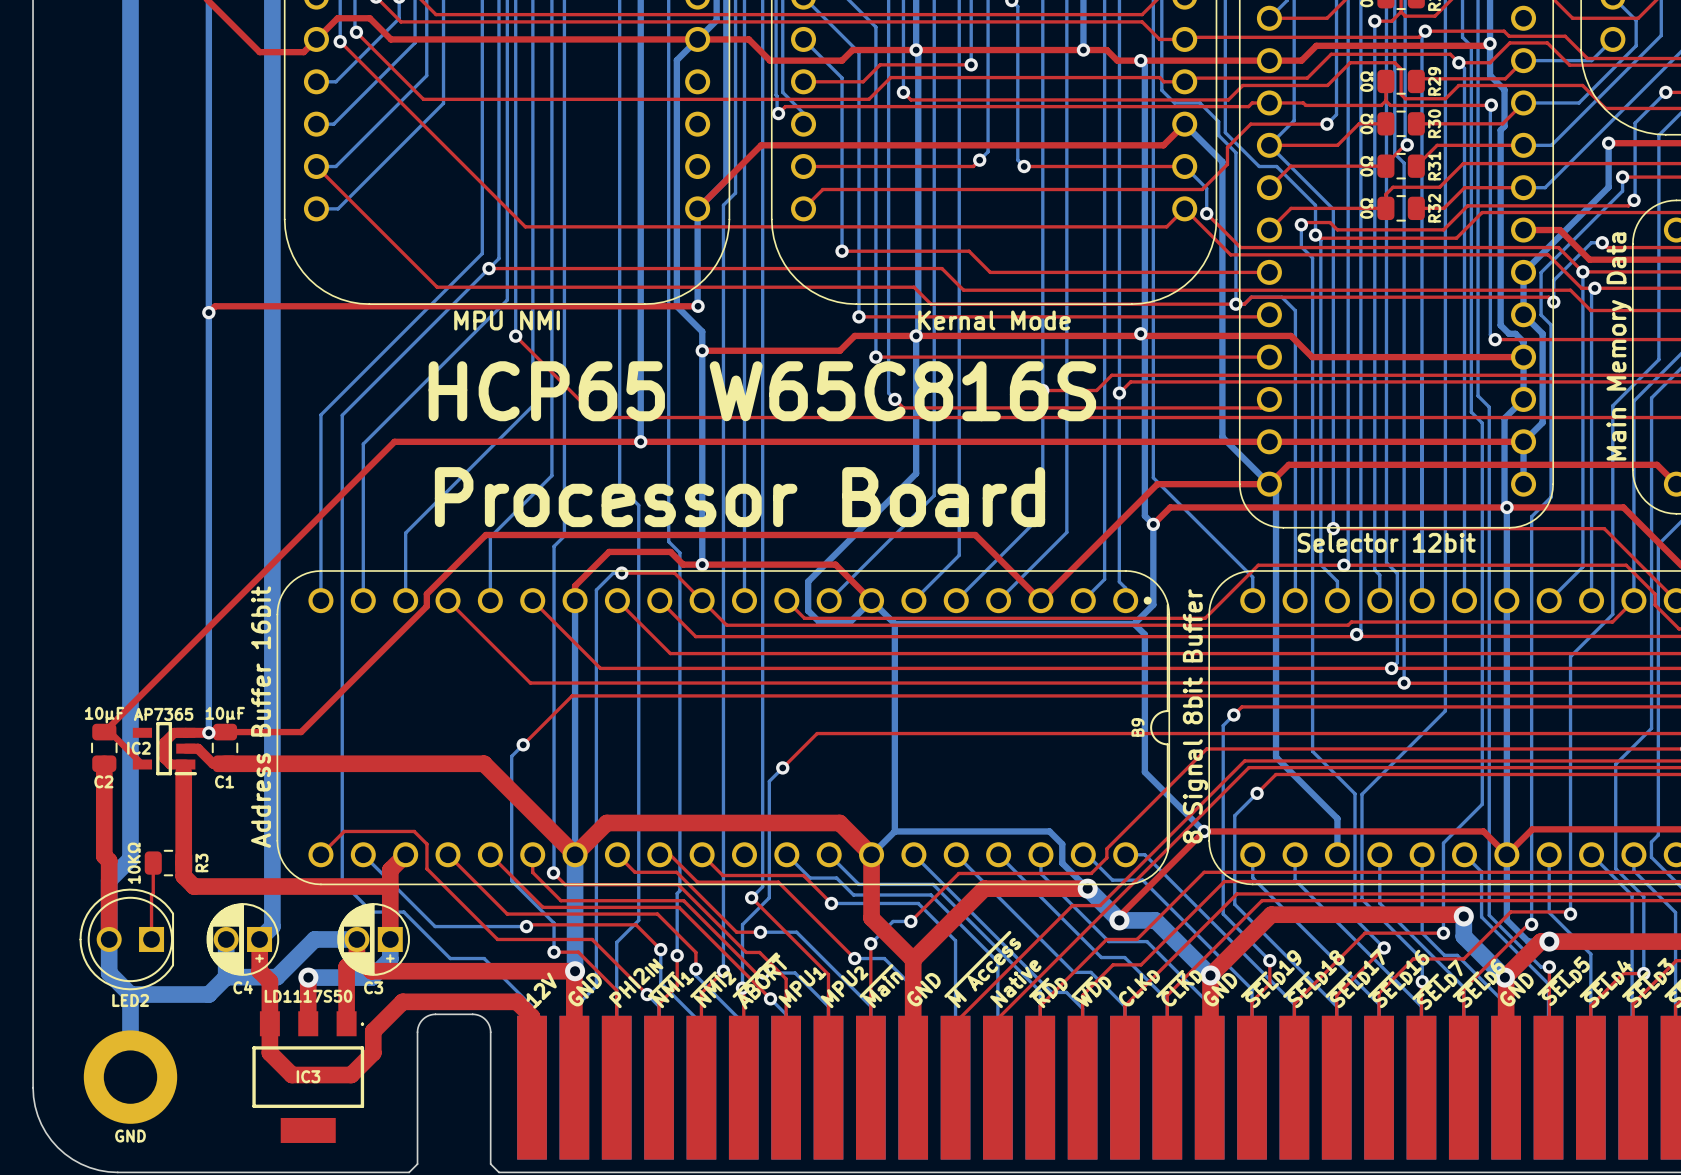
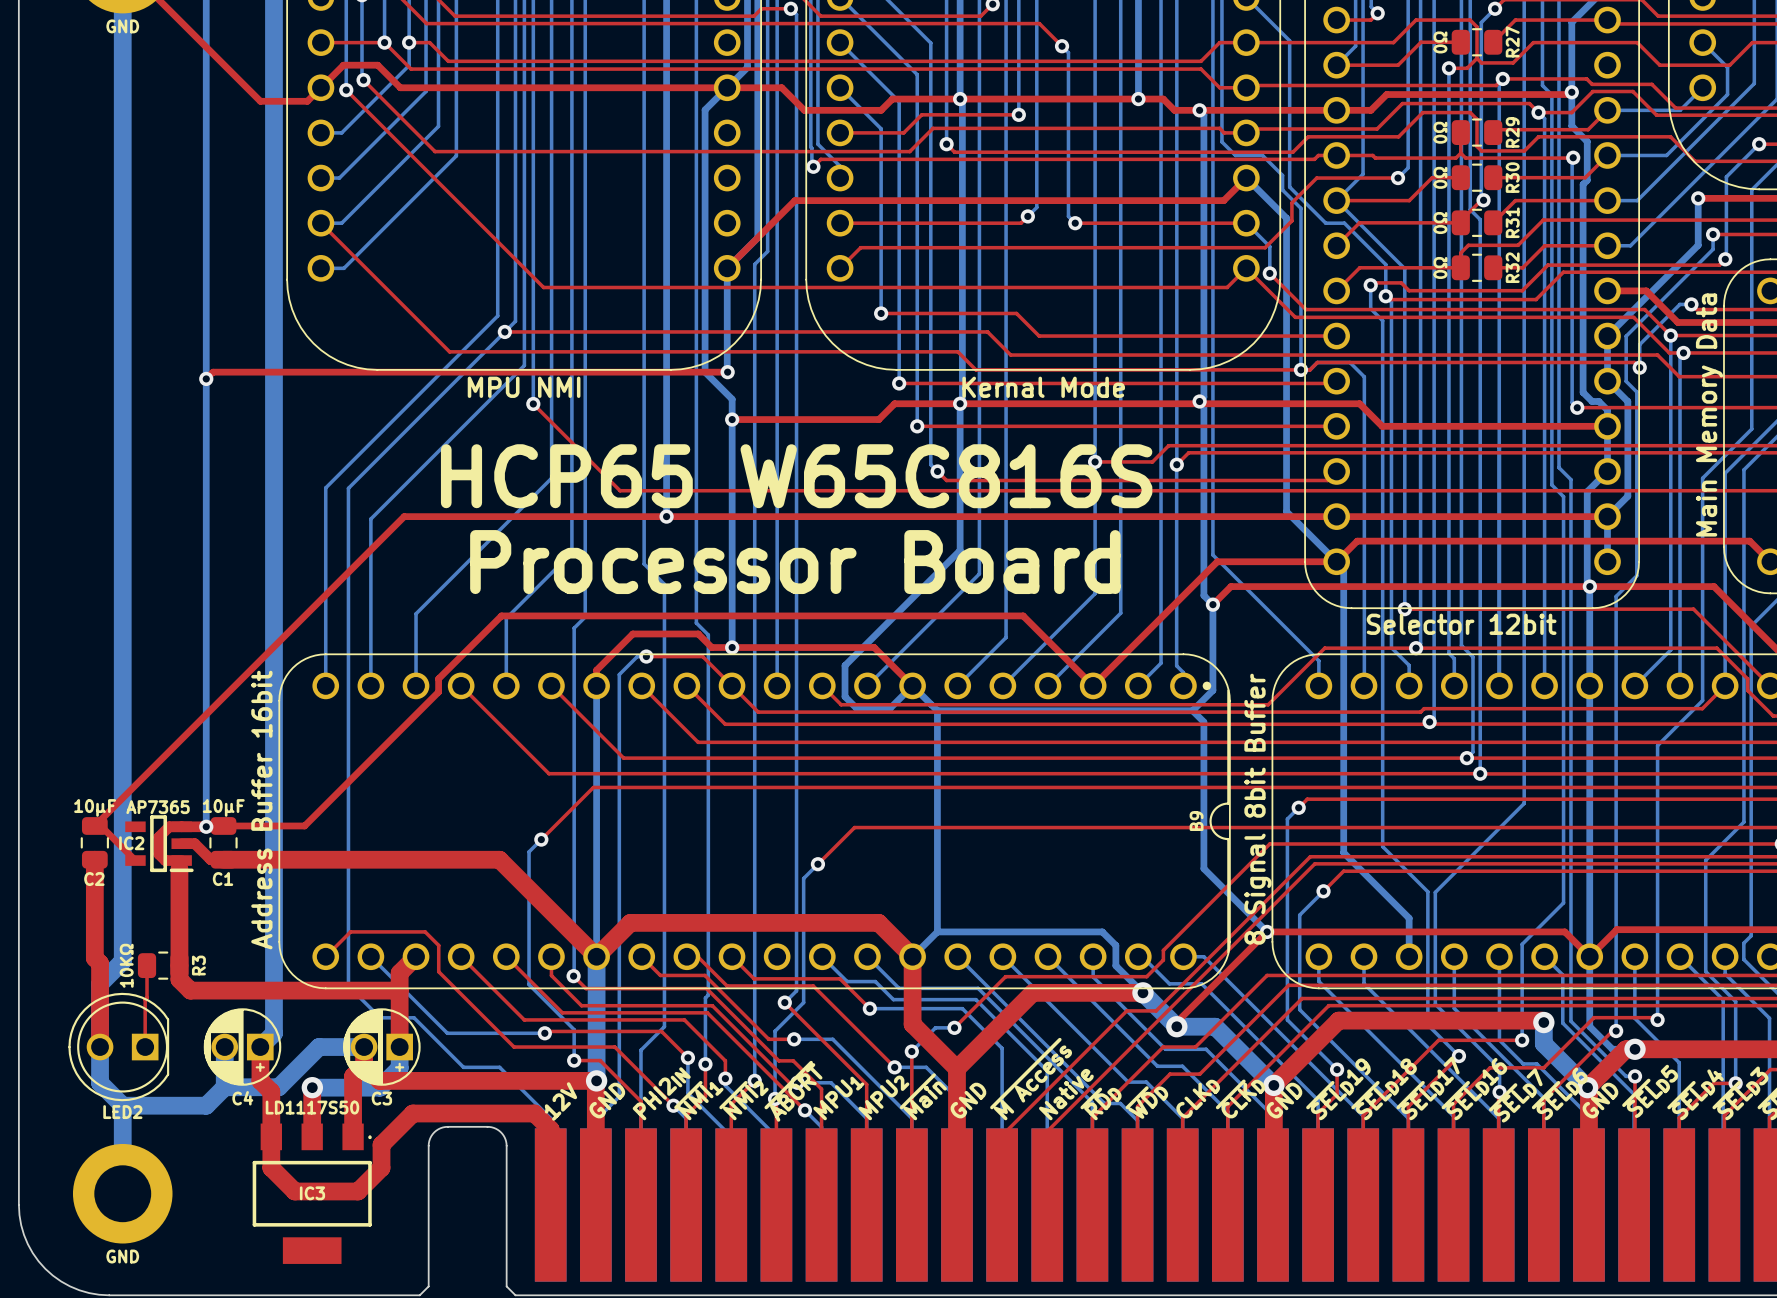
text position: HCP65 W65C816S (762, 391) -> HCP65 W65C816S (796, 476)
text position: Processor Board (740, 497) -> Processor Board (795, 562)

